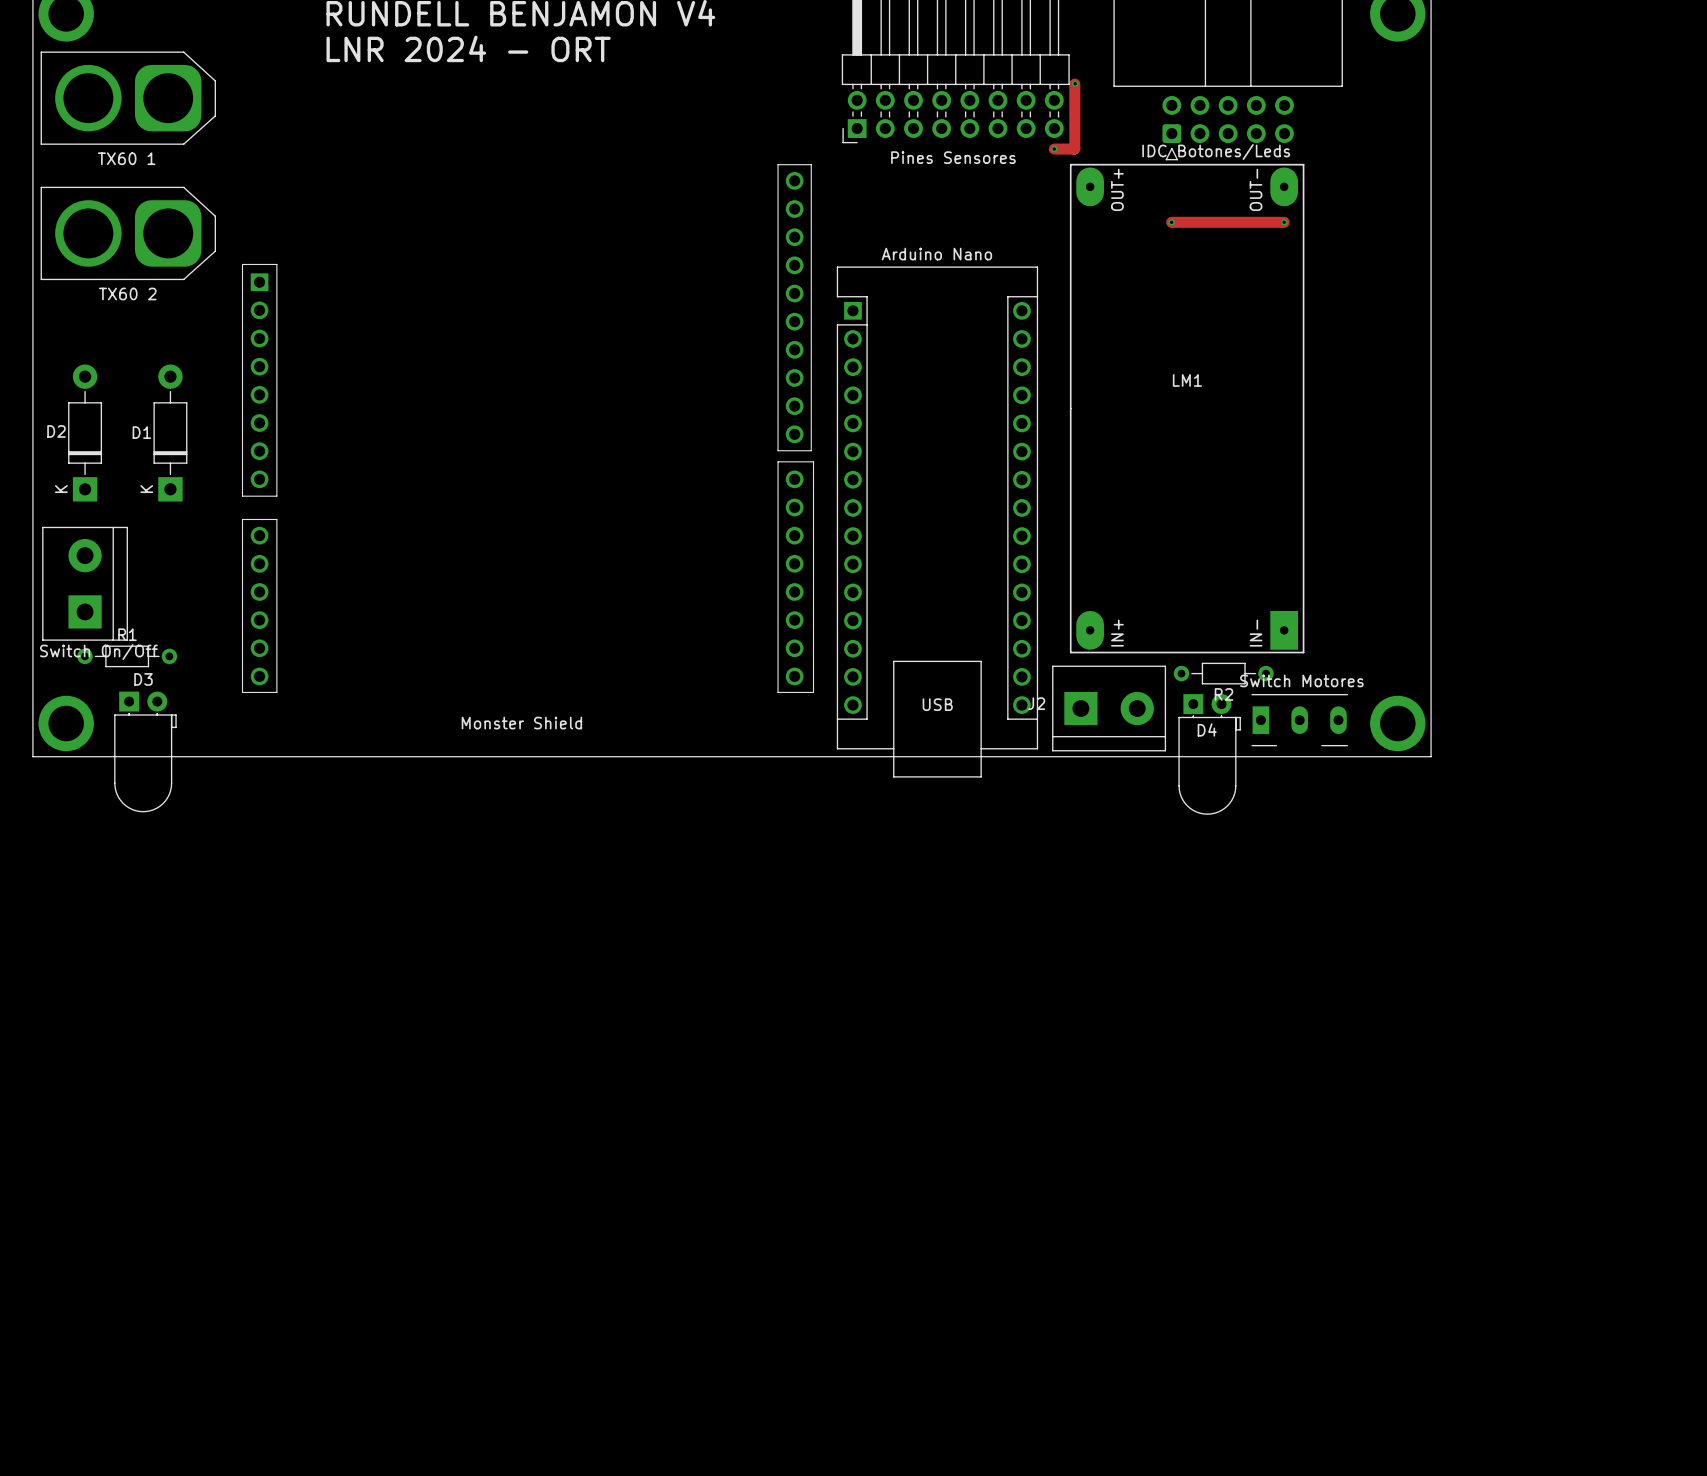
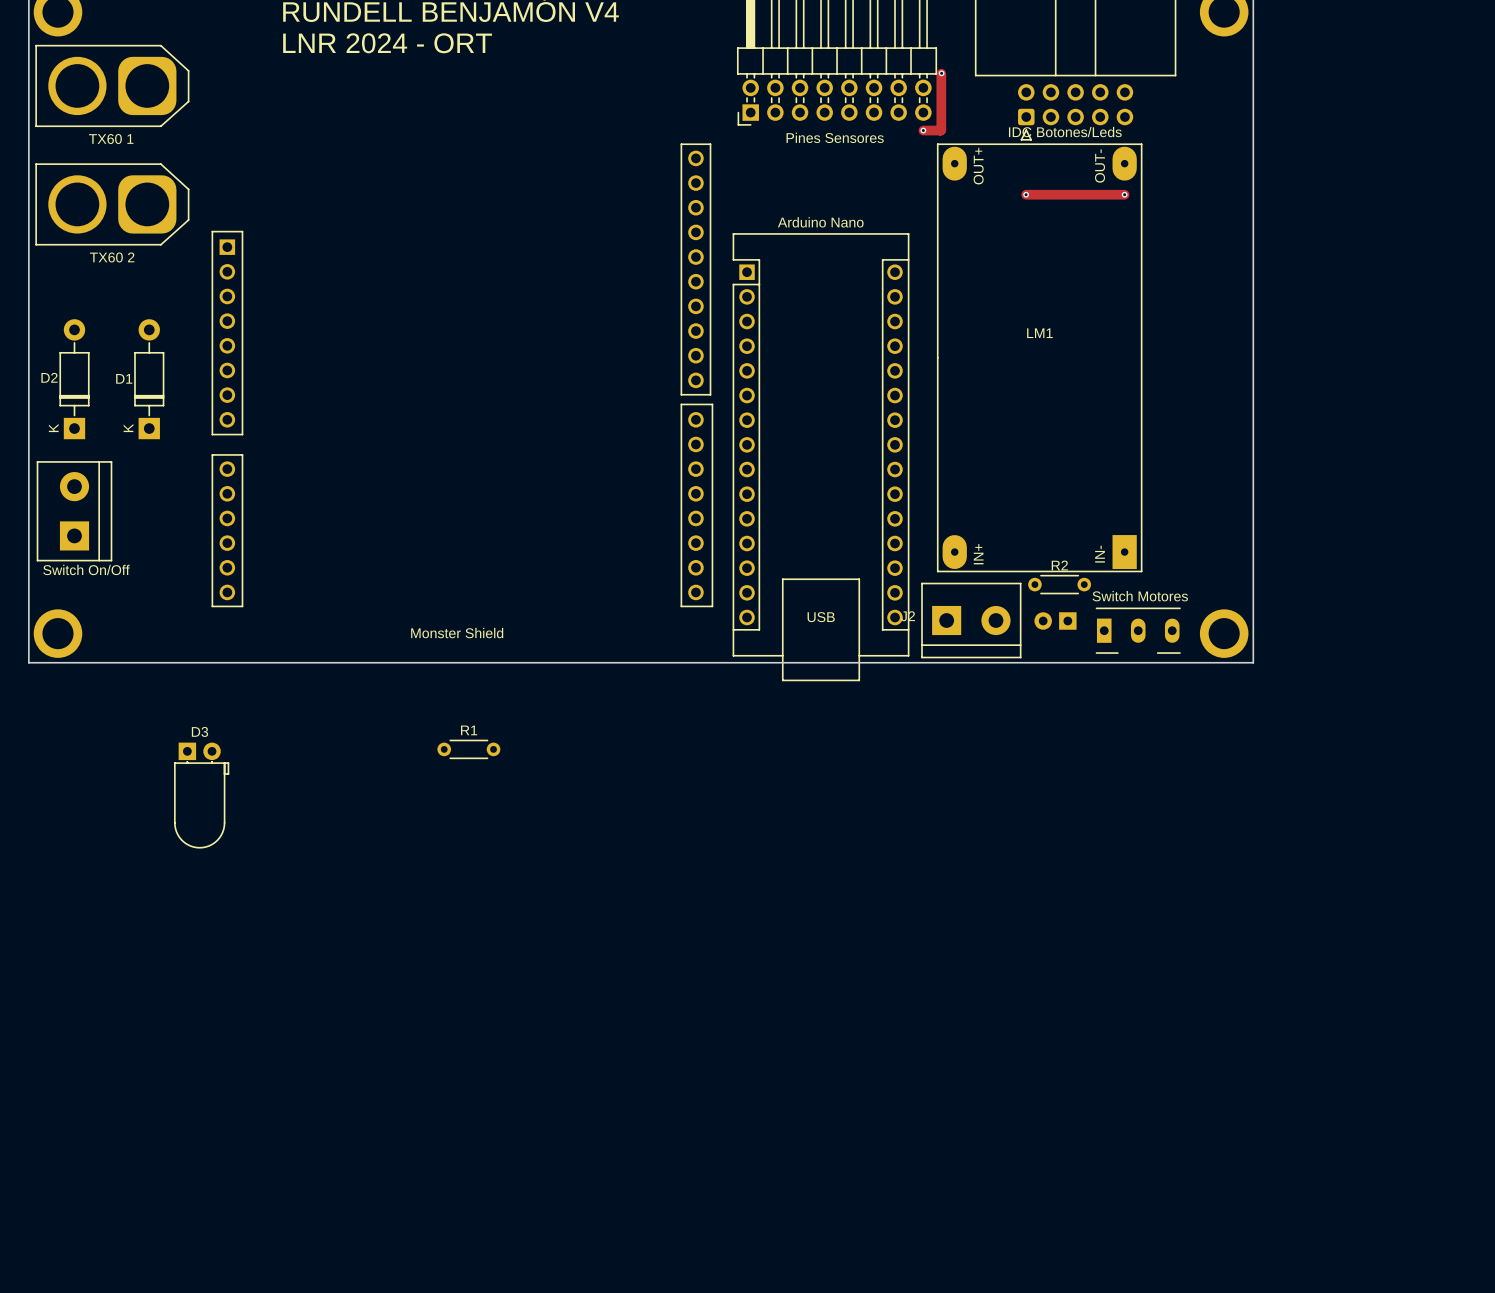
R1 footprint: [77, 645, 178, 668] -> [437, 739, 501, 759]
R2 footprint: [1173, 662, 1274, 685] -> [1028, 575, 1092, 595]
R2 name position: R2 (1223, 694) -> R2 (1059, 565)
D3 position: (145, 751) -> (201, 795)
D4 side: top (1209, 754) -> bottom (1055, 620)

